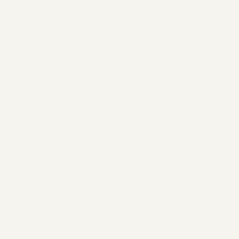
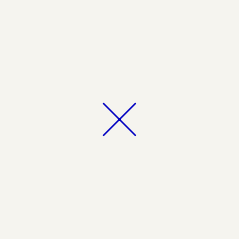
no-connect mark: none -> (119, 119)

